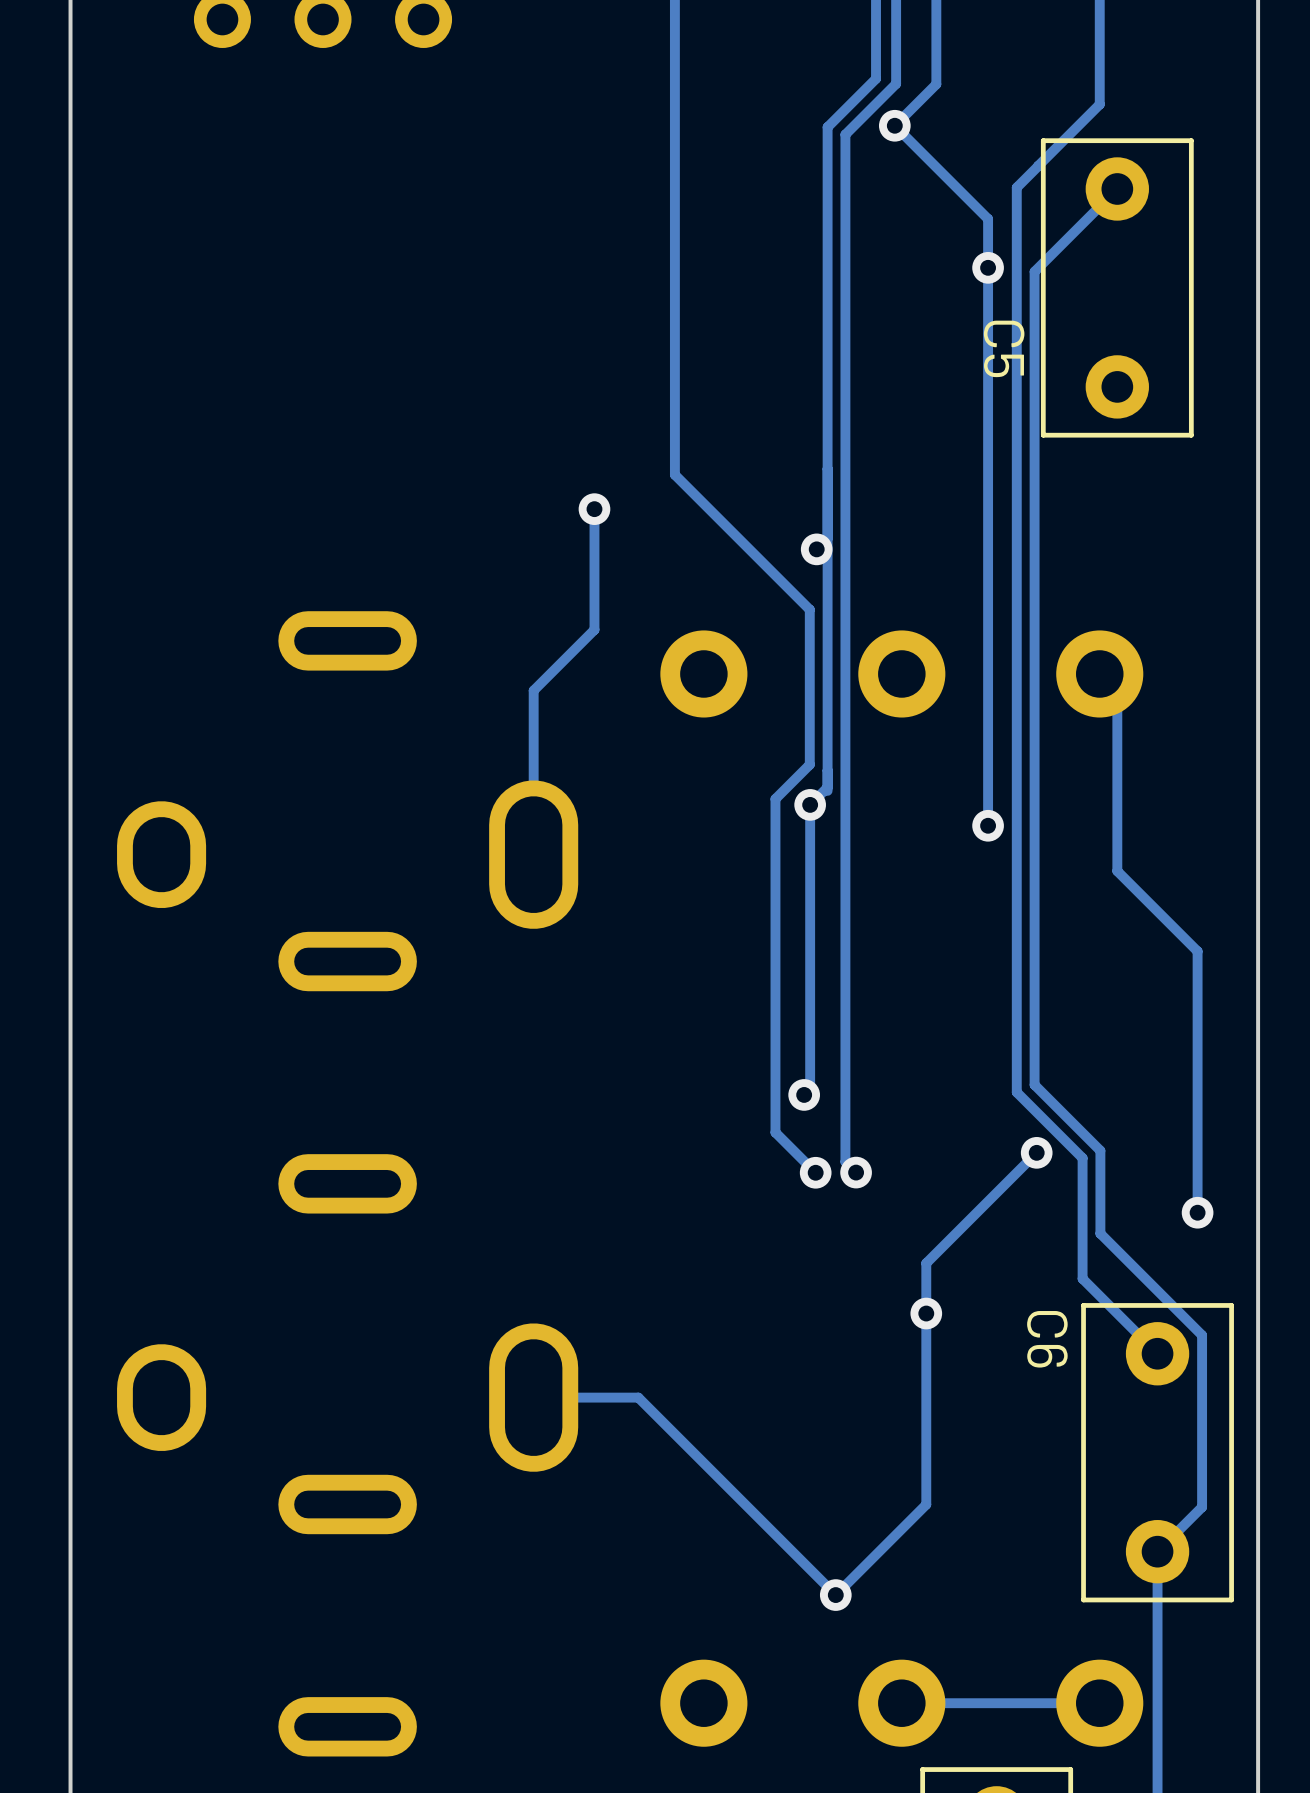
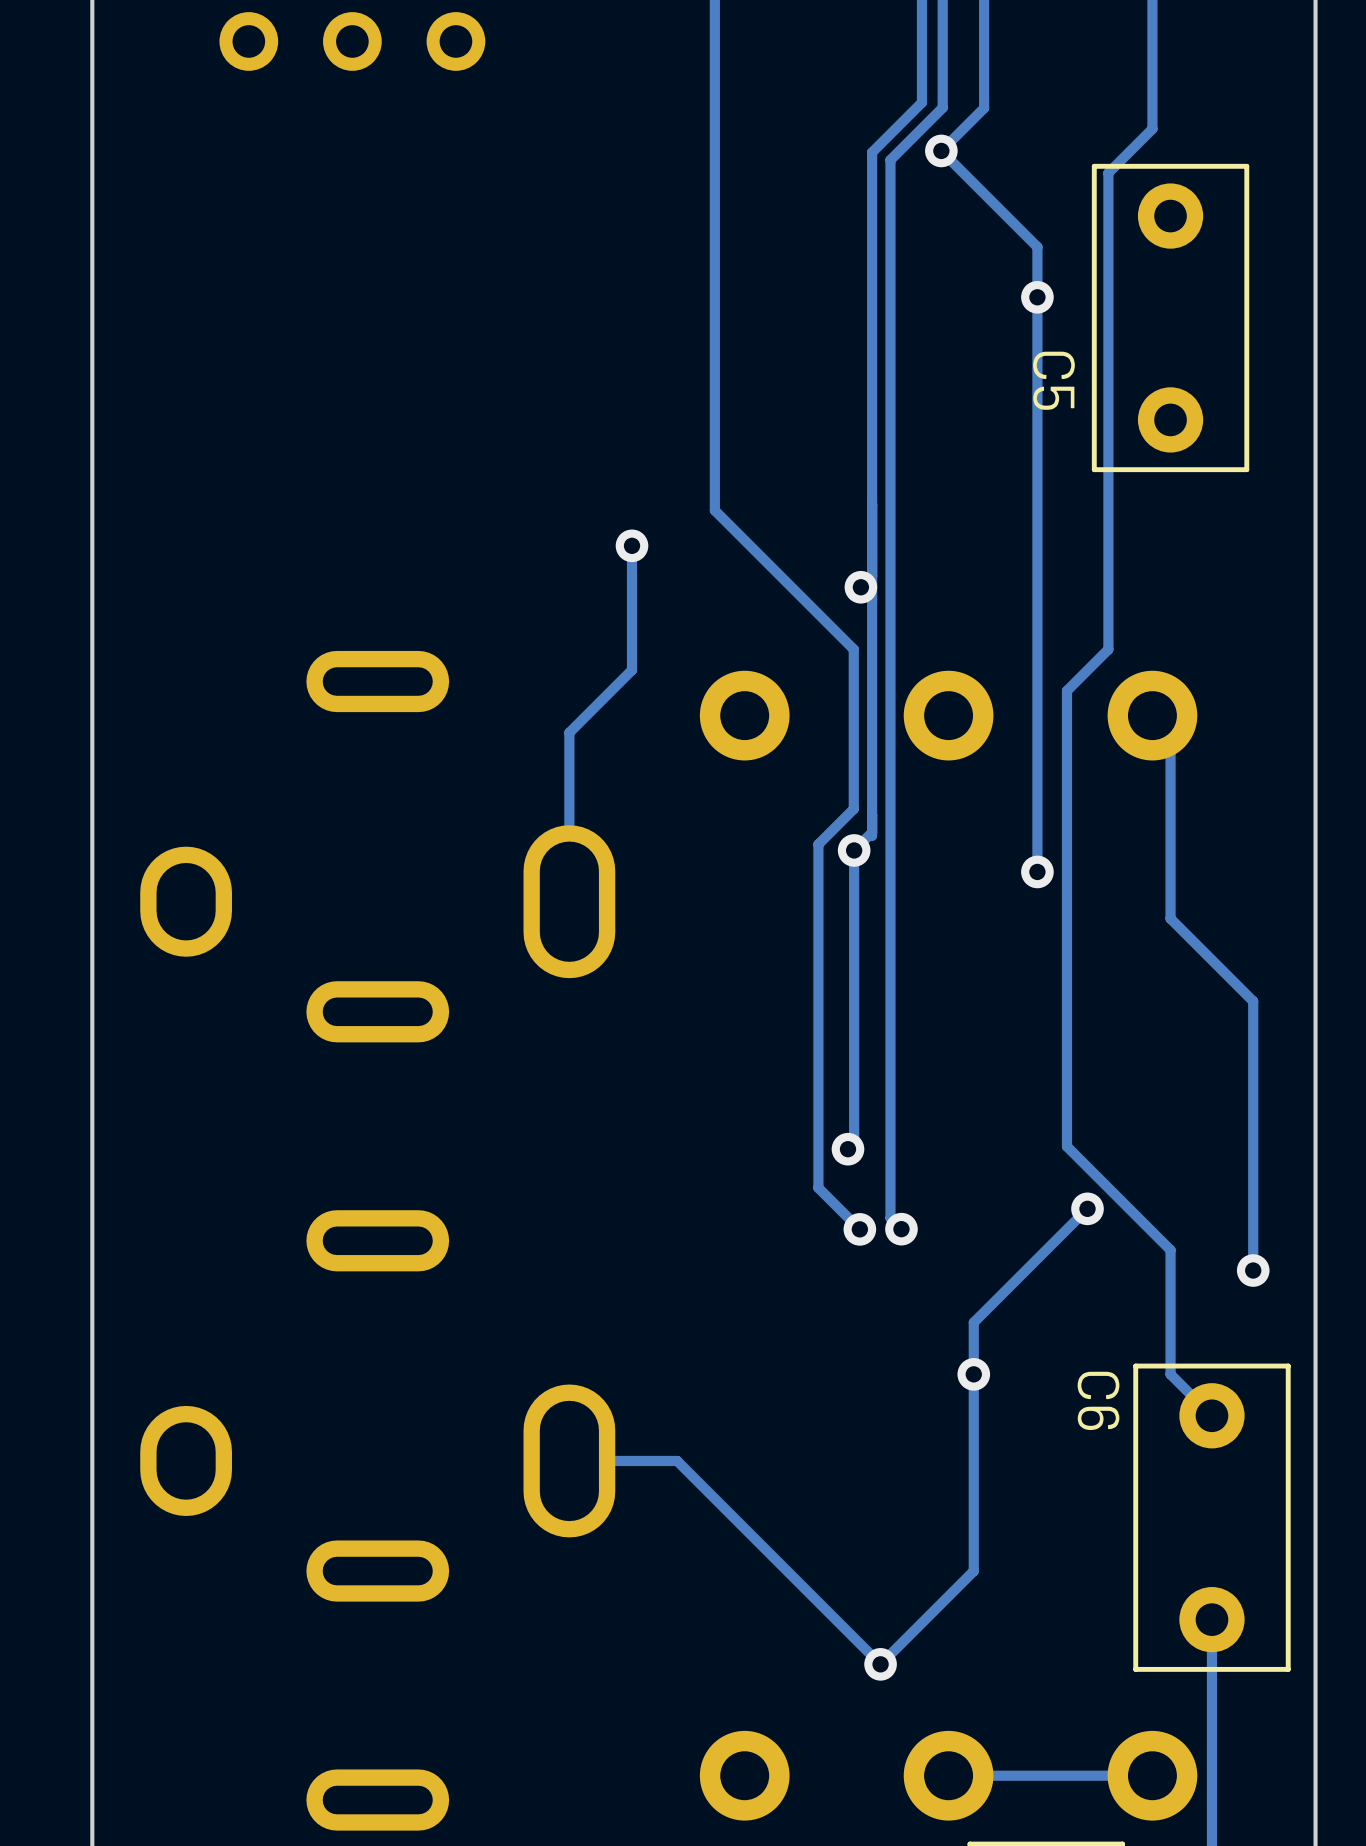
track: (1057, 147) (1016, 187) (1016, 649) -> (1108, 173) (1108, 649) (1066, 690)
track: (1117, 188) (1034, 271) (1034, 1084) (1100, 1150) (1100, 1233) (1202, 1335) (1202, 1507) (1157, 1551) -> none
track: (1082, 1158) (1082, 1278) (1117, 1313) -> (1134, 1214) (1170, 1250) (1170, 1374)

